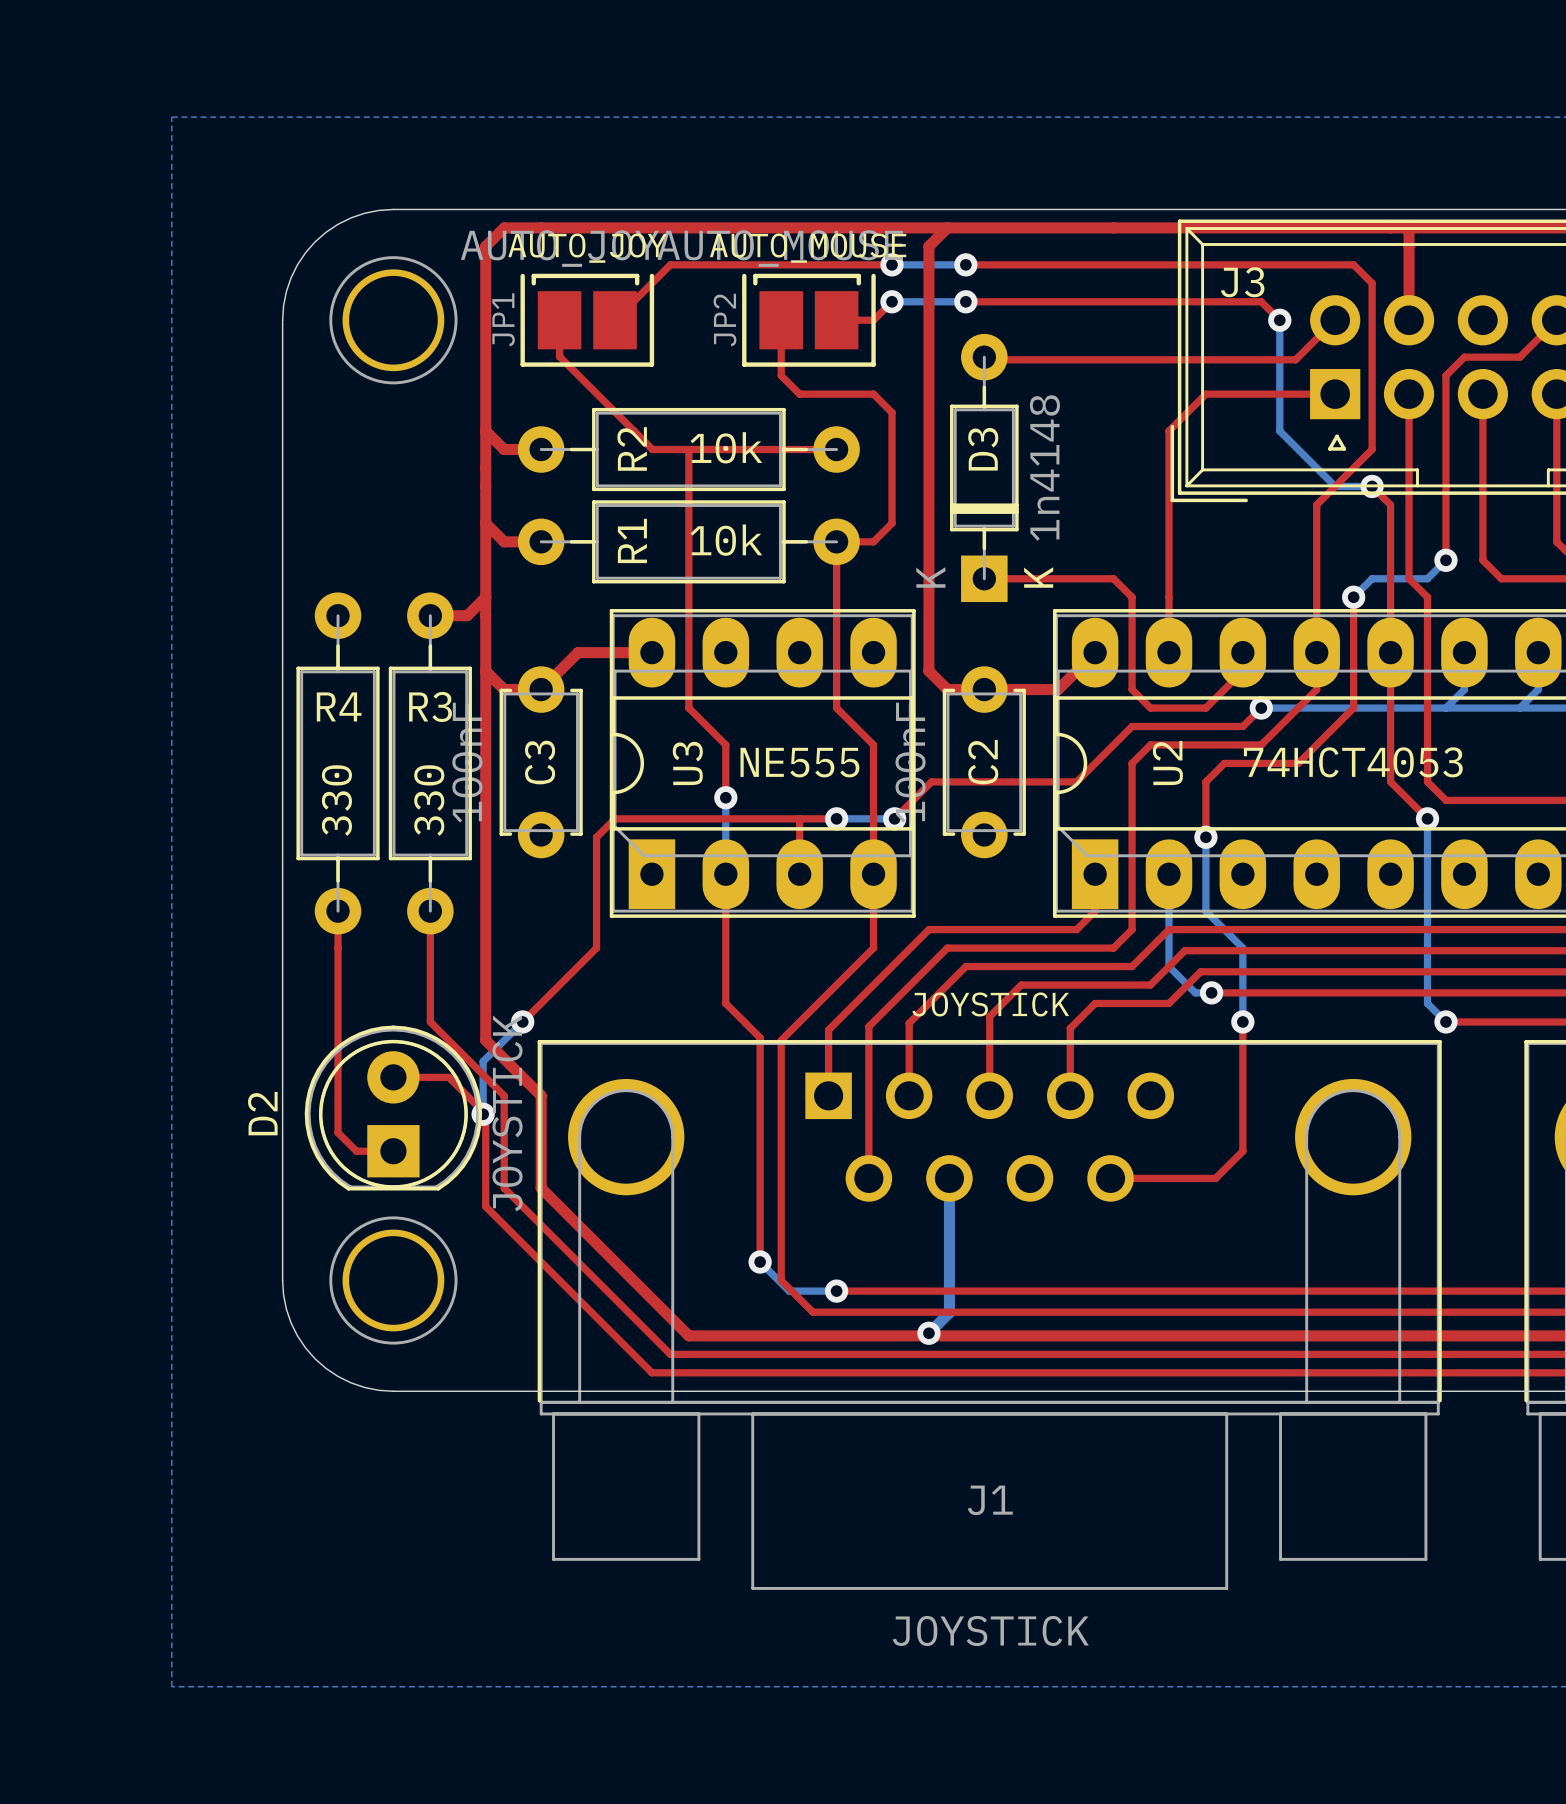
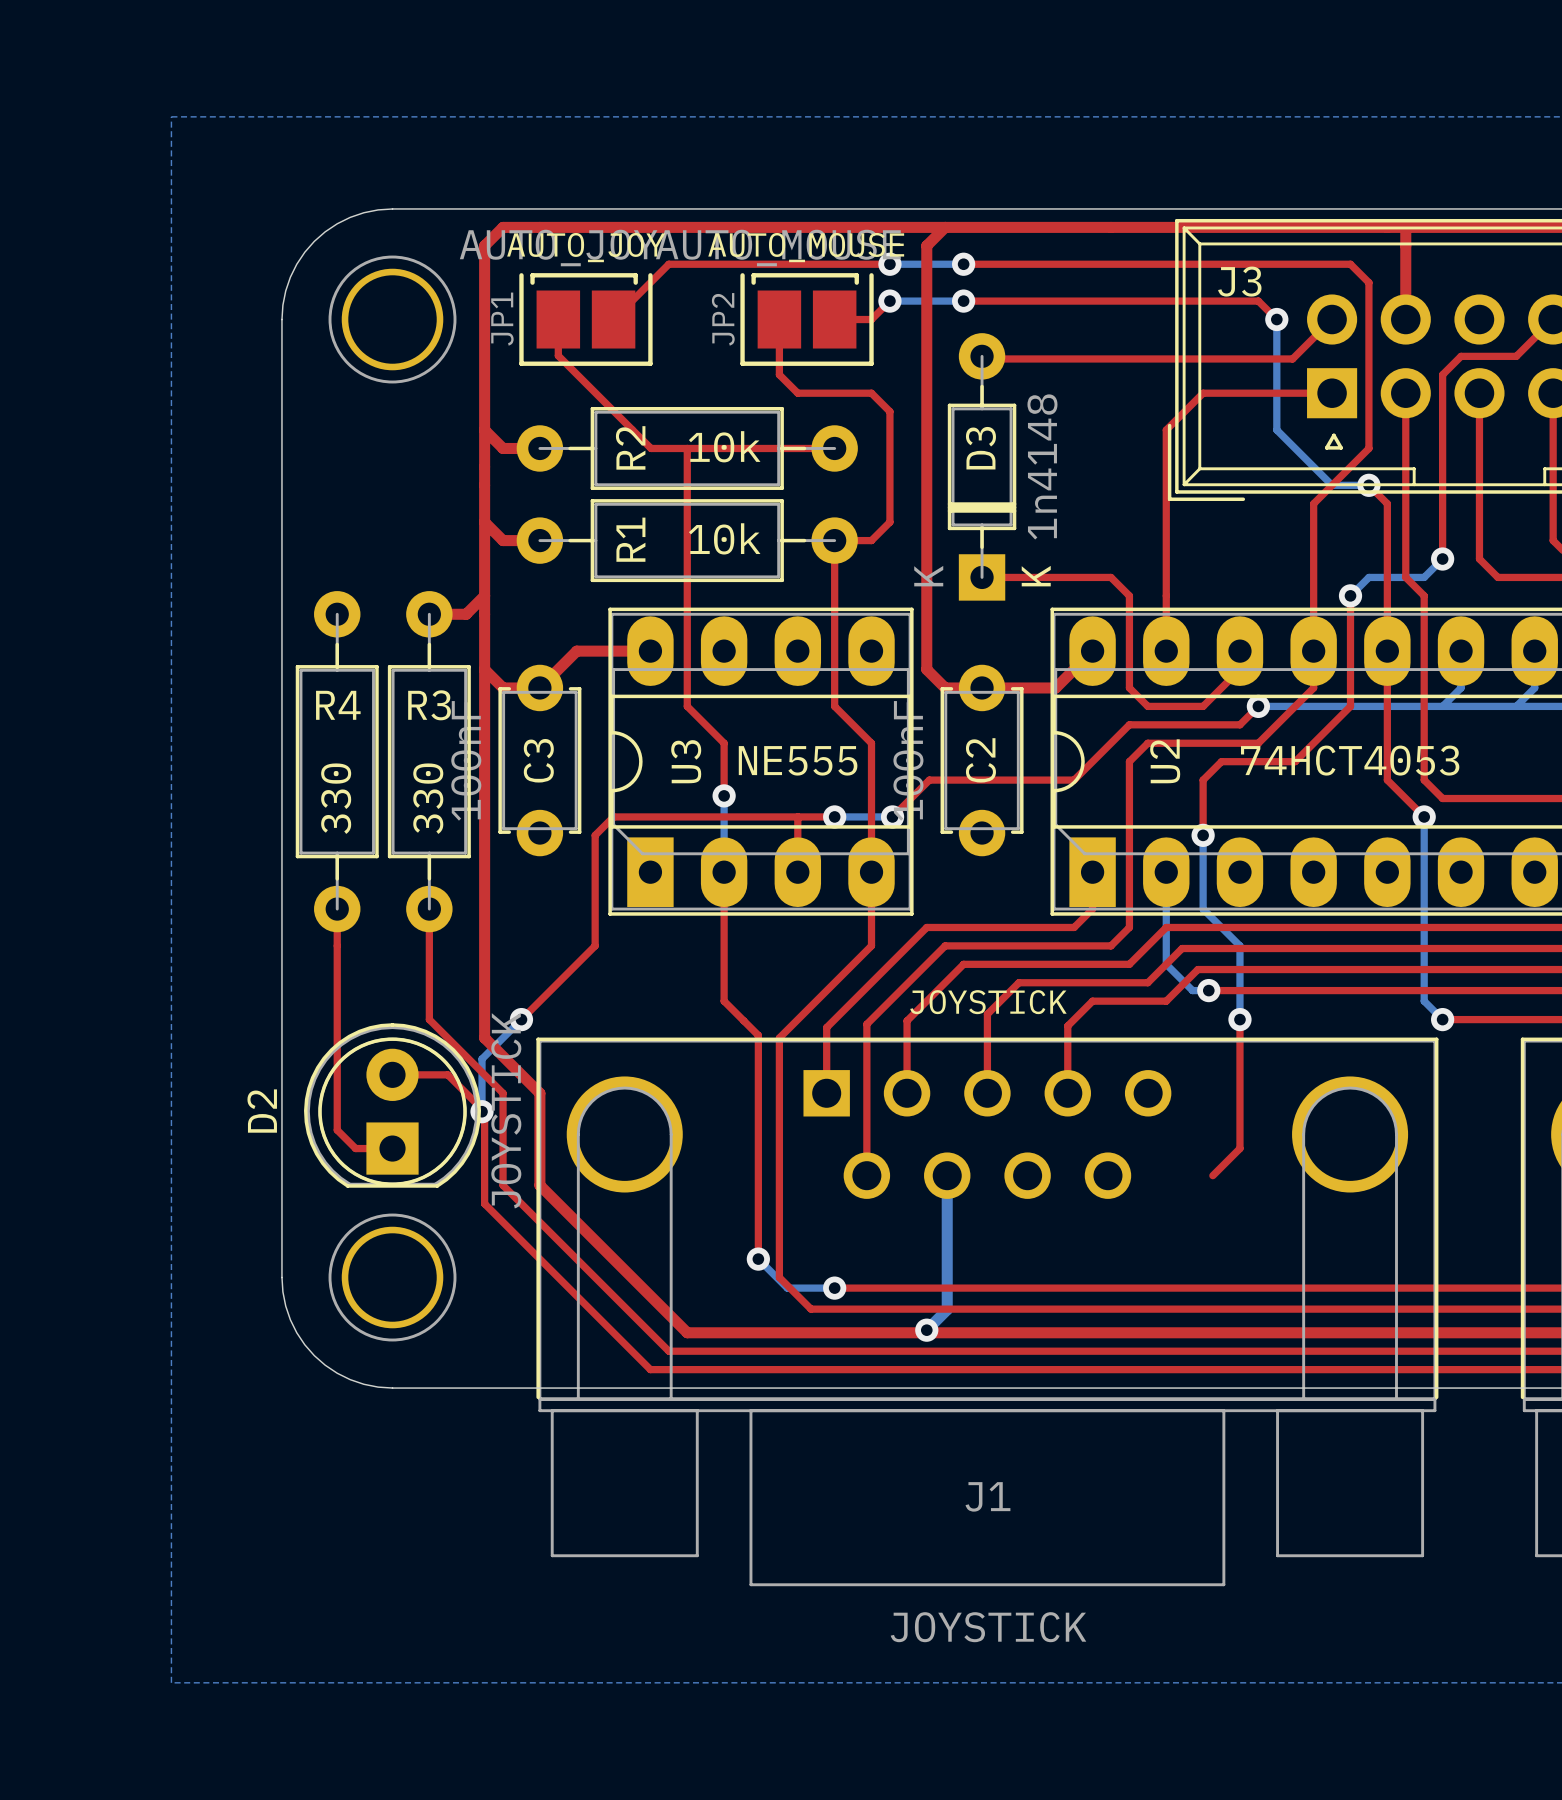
top track: (1110, 1178) (1215, 1178) -> none

